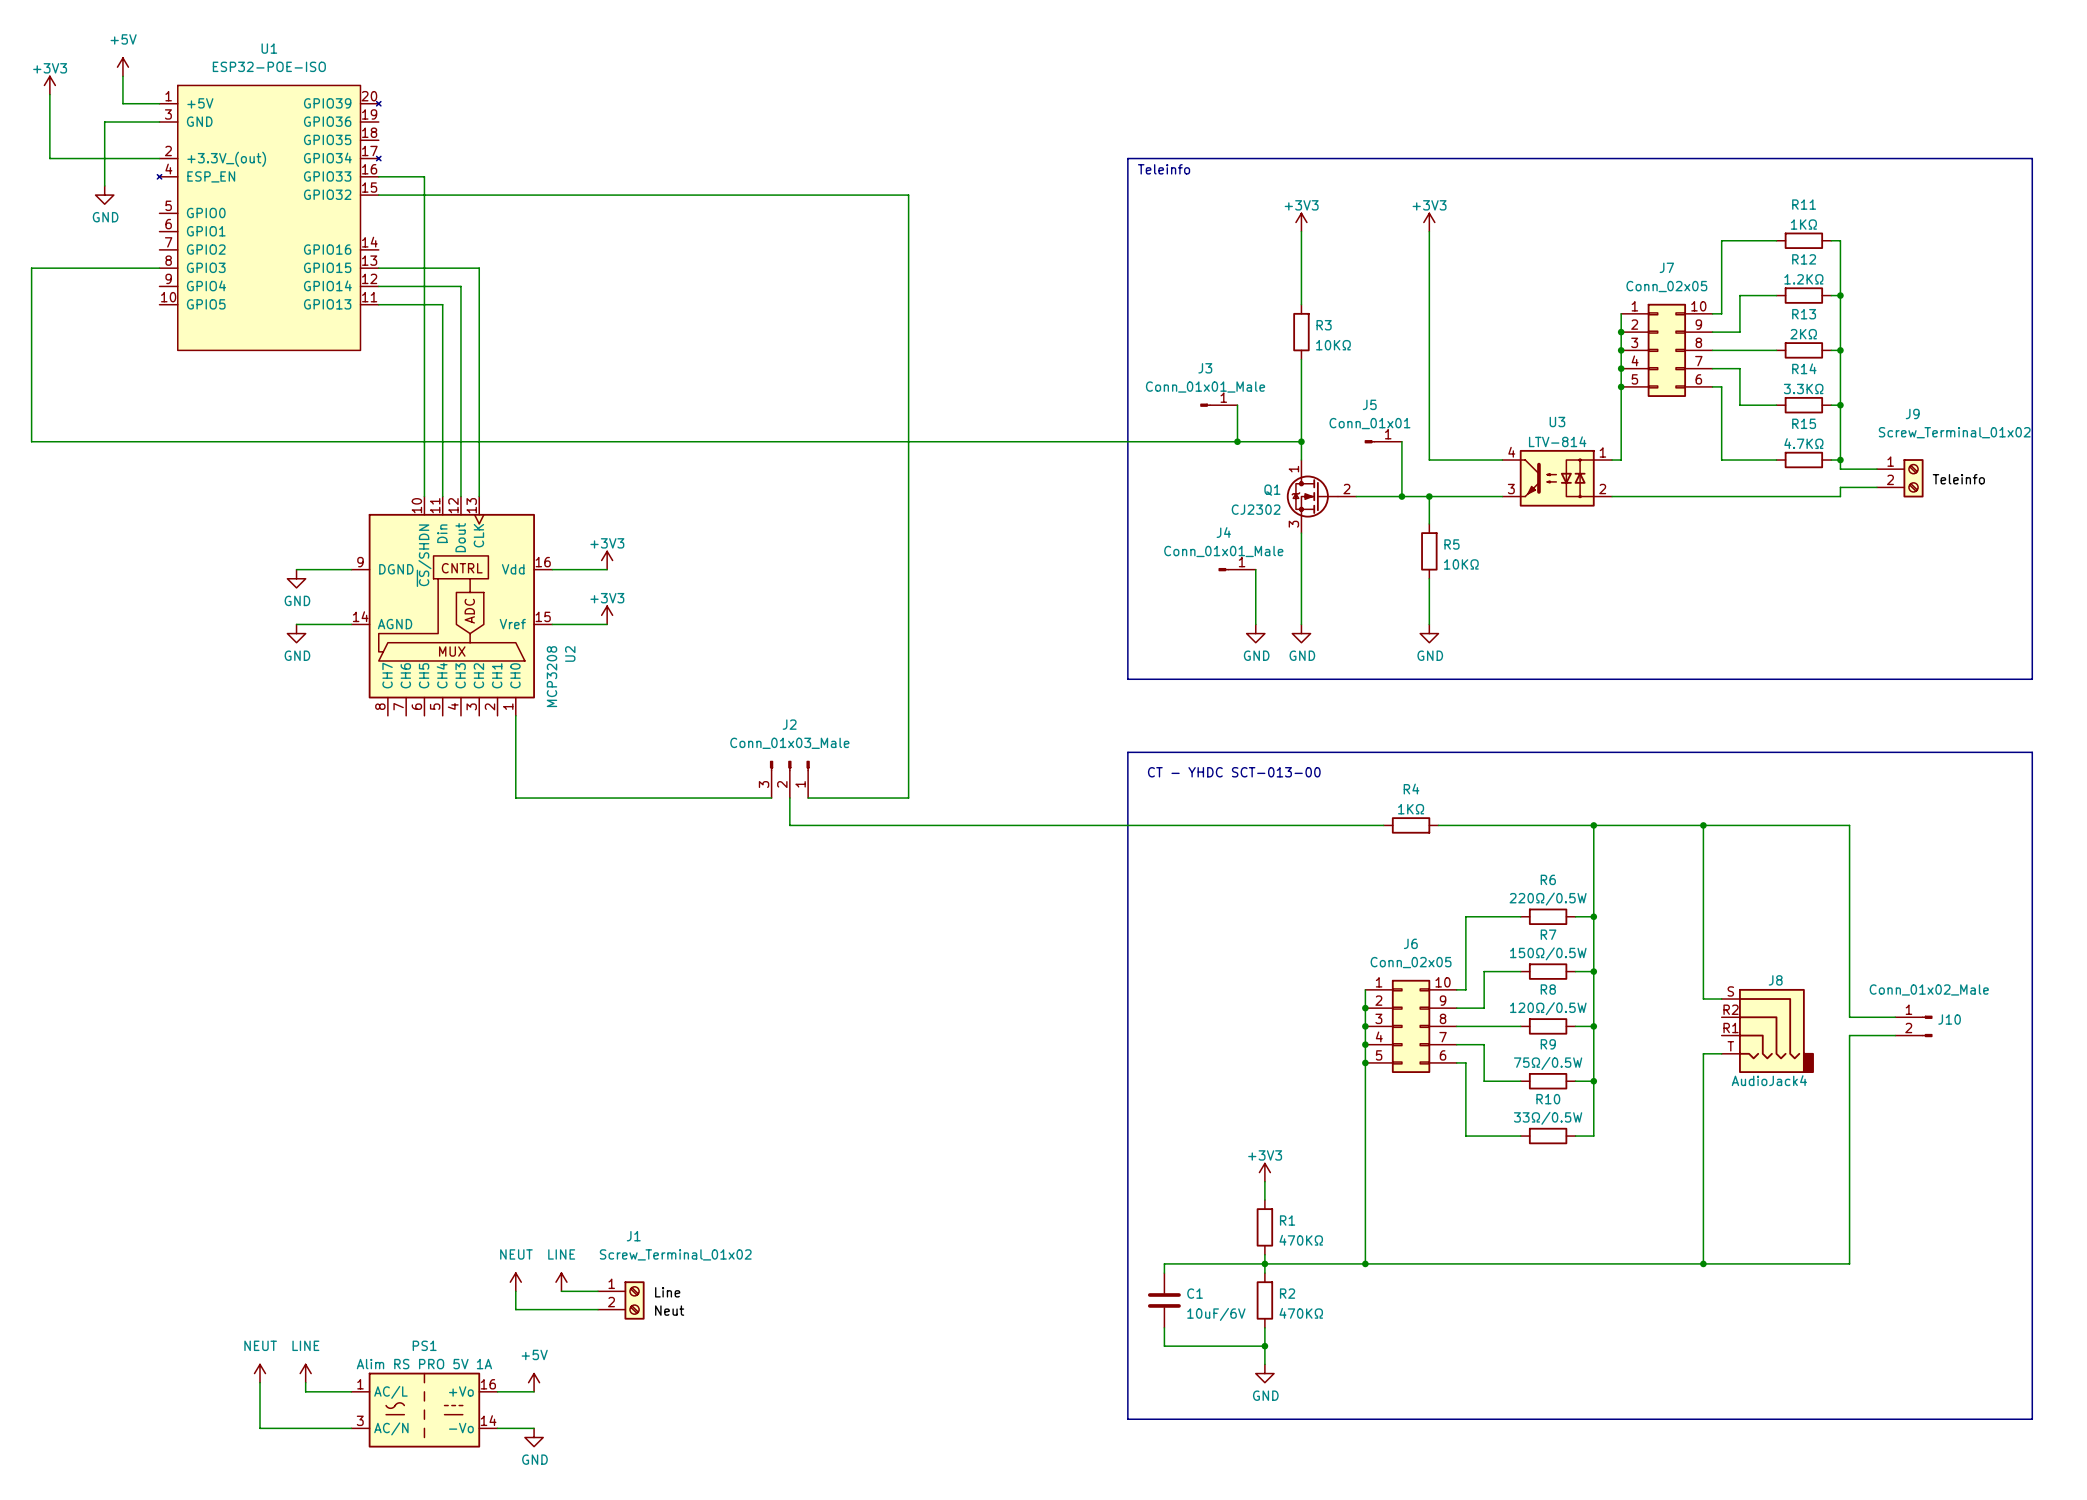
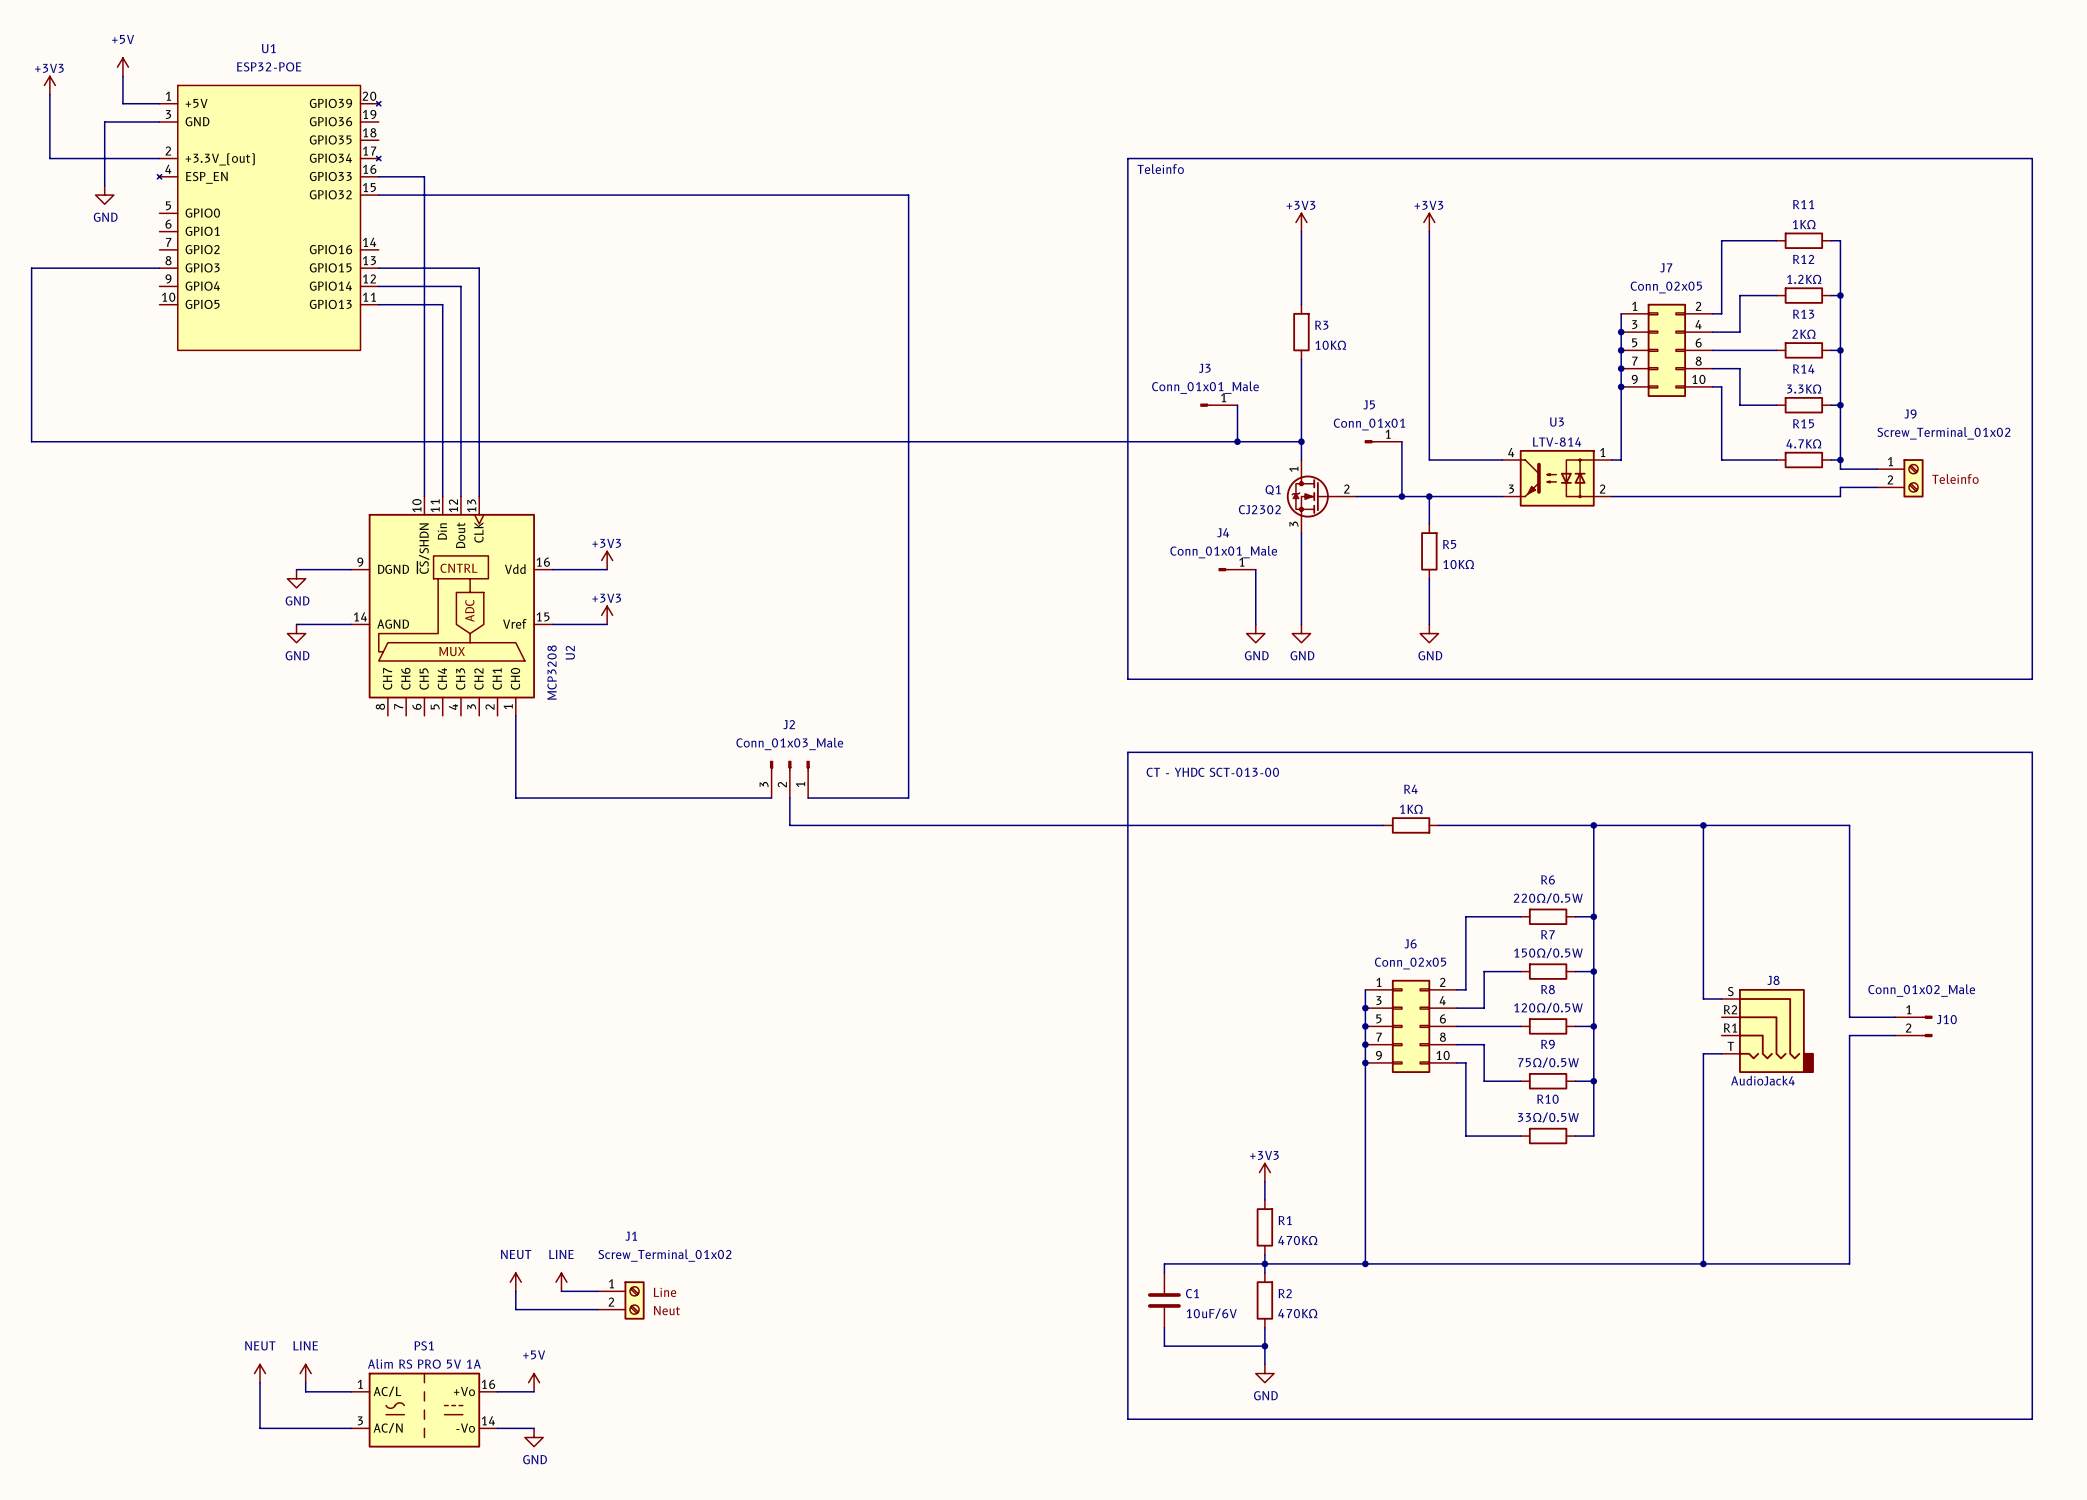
U1 value: ESP32-POE-ISO (269, 66) -> ESP32-POE (269, 66)
J7 symbol: [1621, 303, 1713, 397] -> [1621, 303, 1713, 397]
J6 symbol: [1365, 979, 1457, 1074] -> [1365, 979, 1457, 1074]

